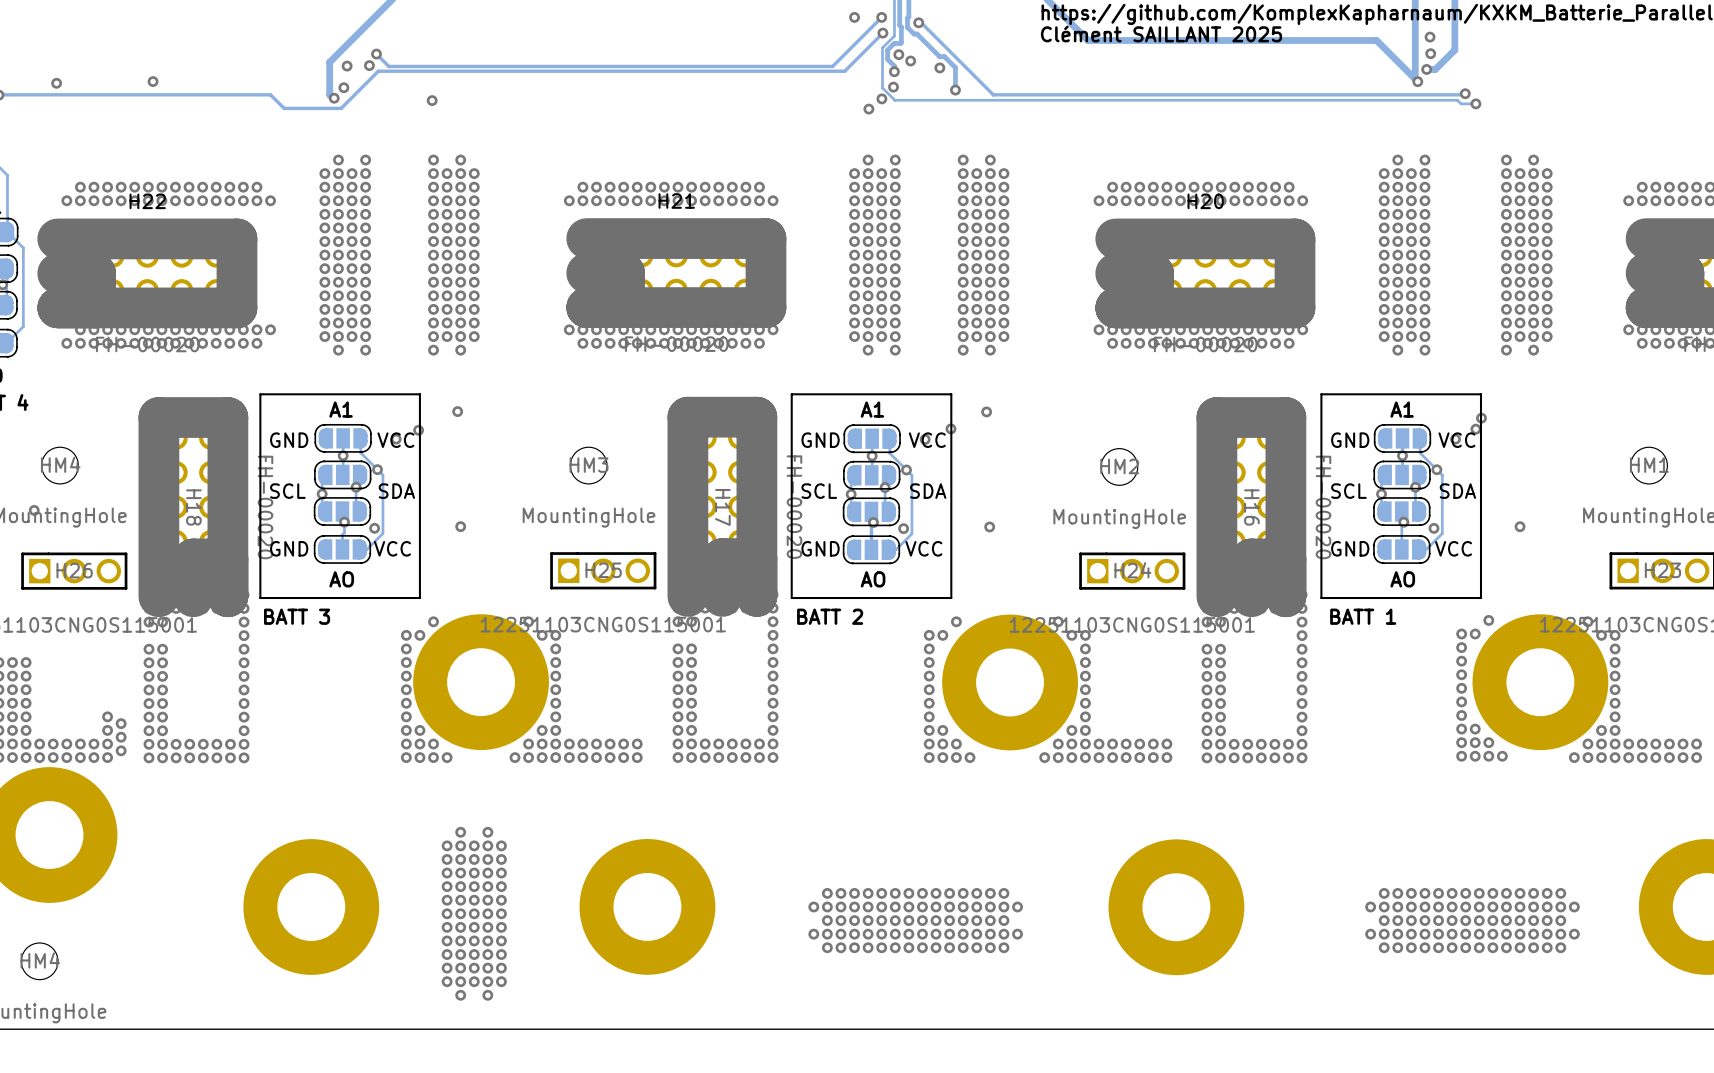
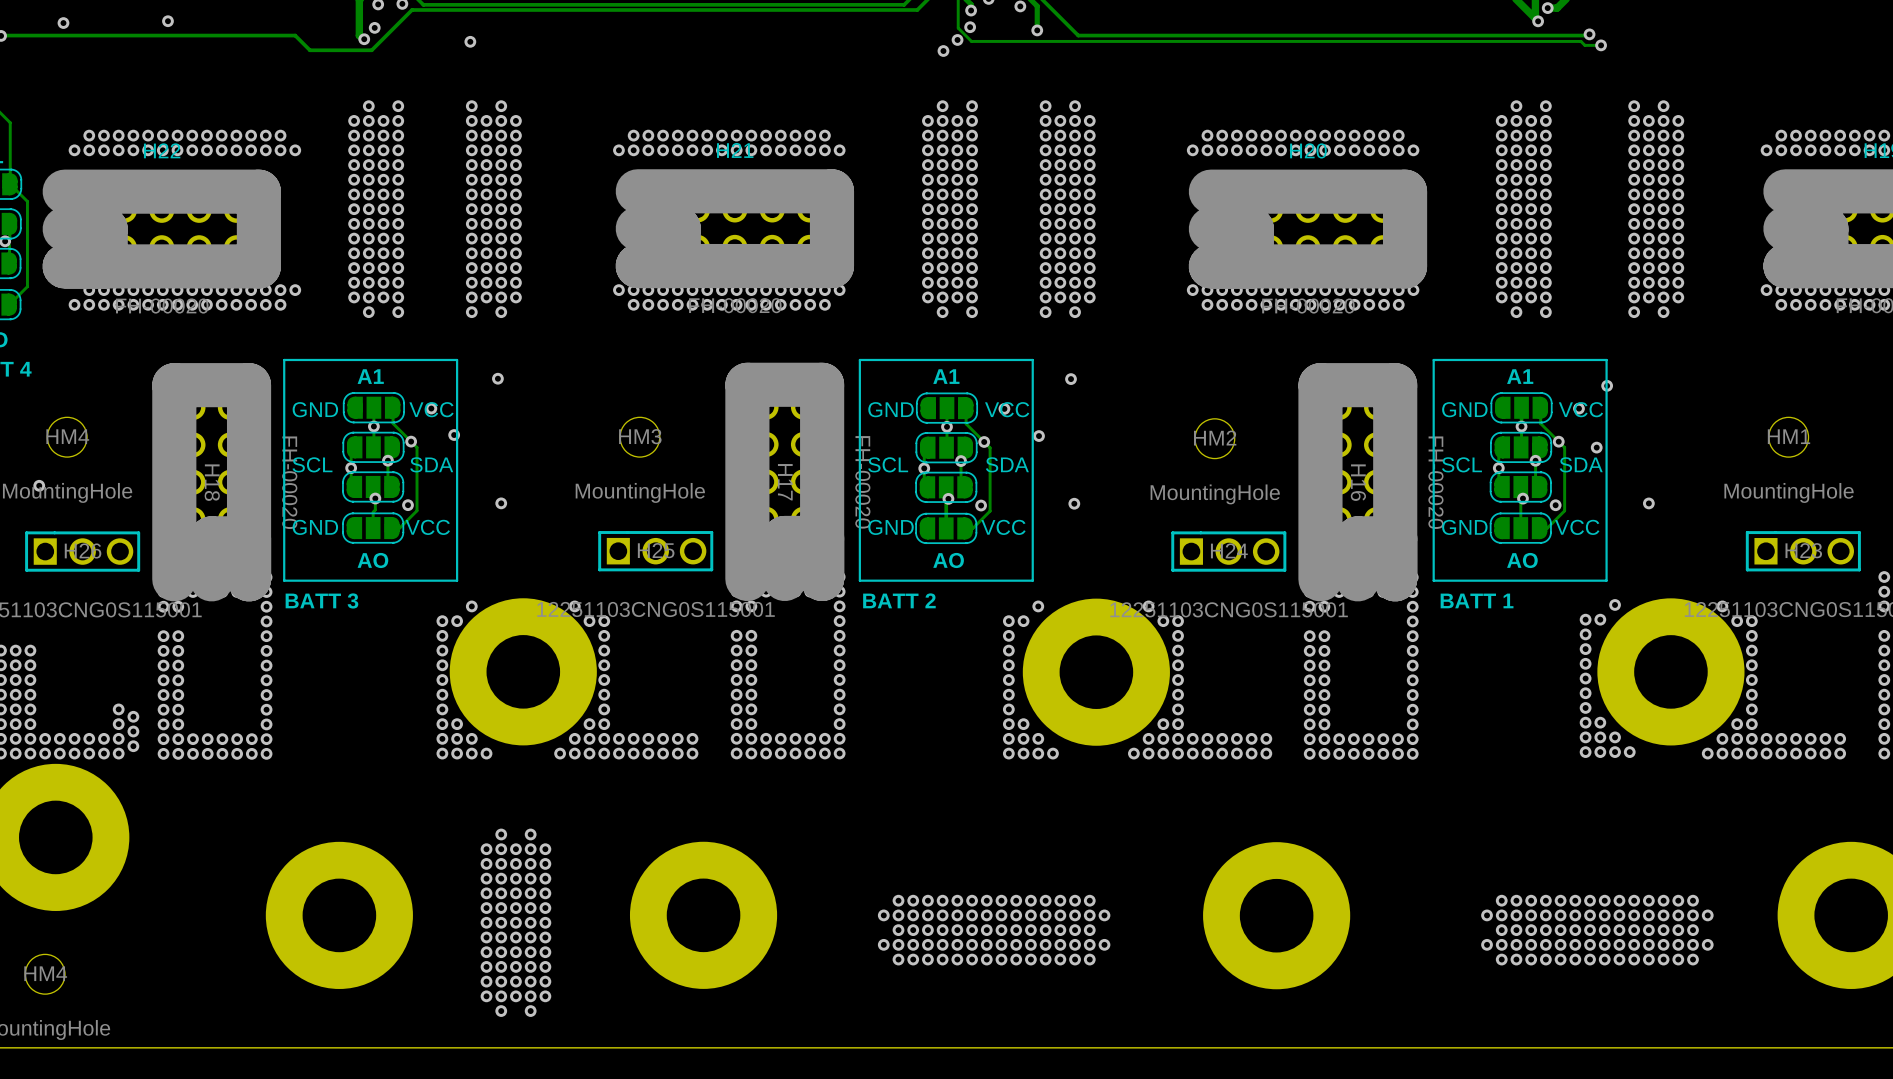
via position: (950, 428) -> (1039, 436)
via position: (1475, 429) -> (1596, 447)
via position: (418, 430) -> (454, 435)

